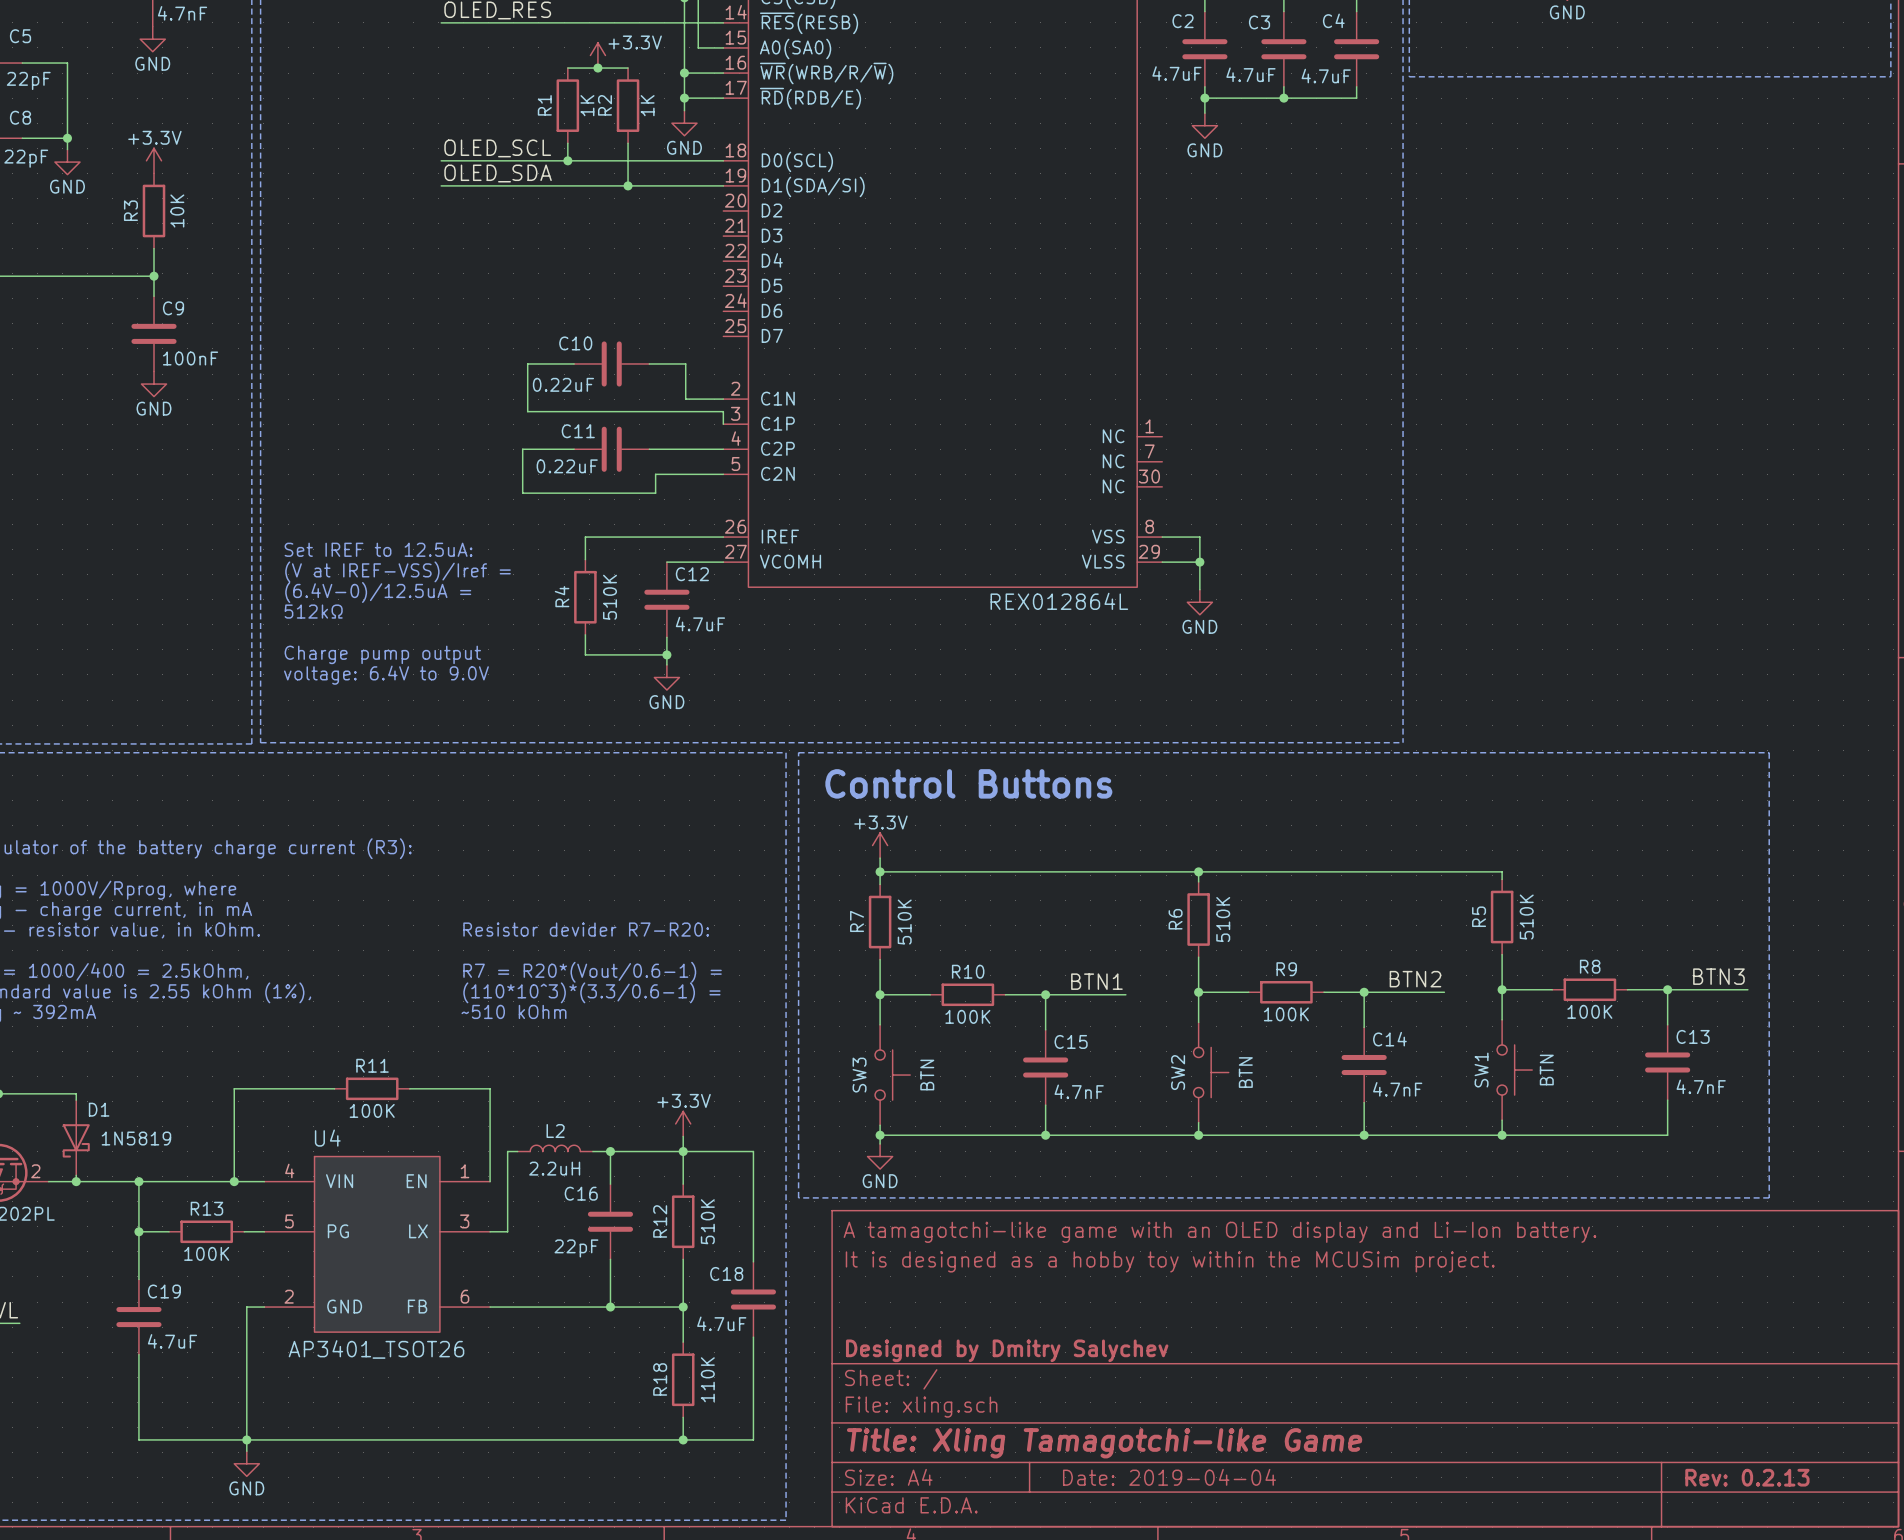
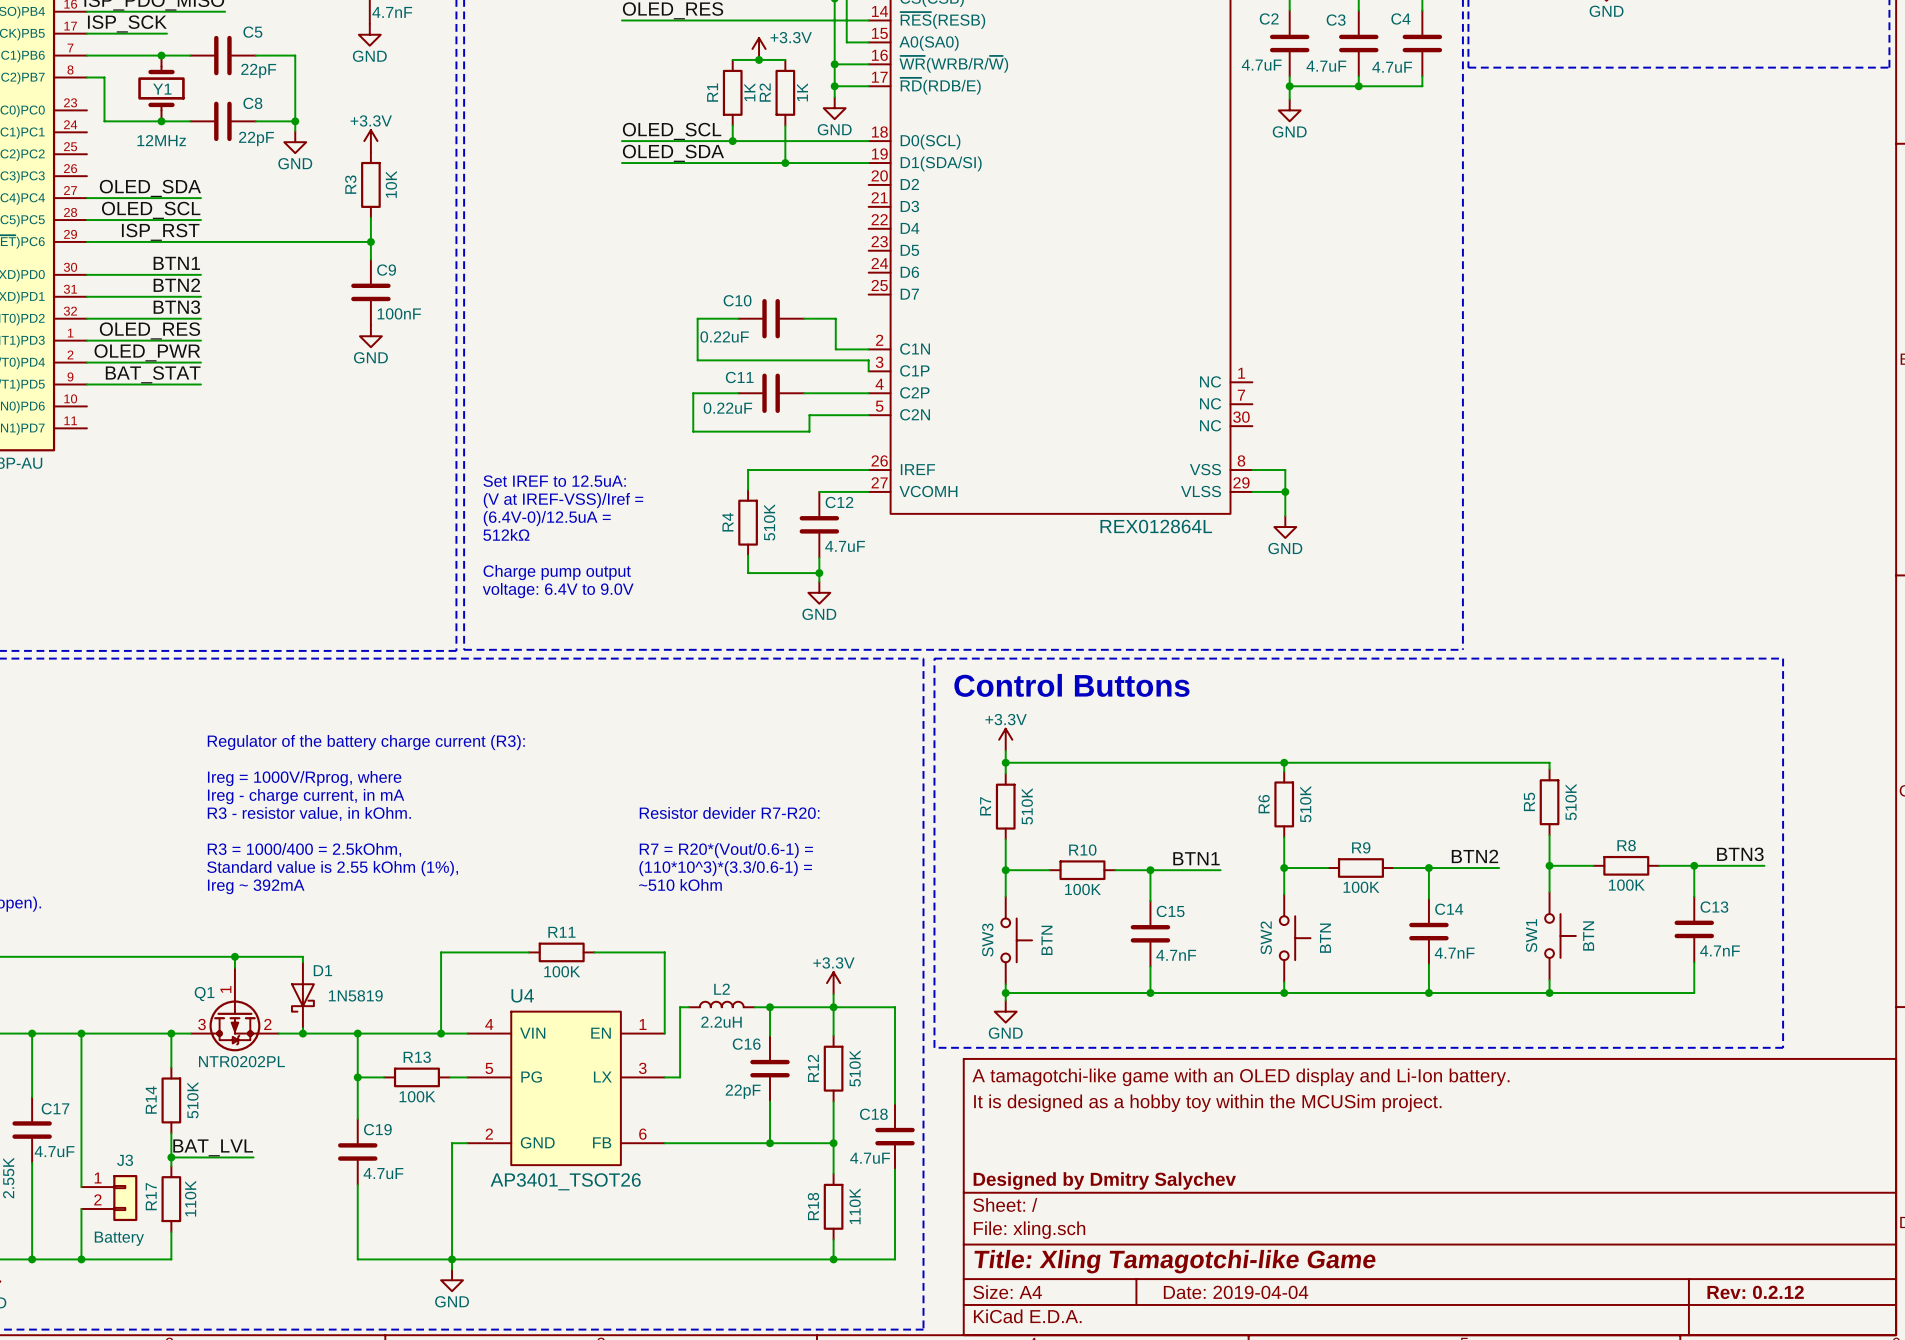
title block: Rev: 0.2.13 (1747, 1477) -> Rev: 0.2.12 (1755, 1292)

